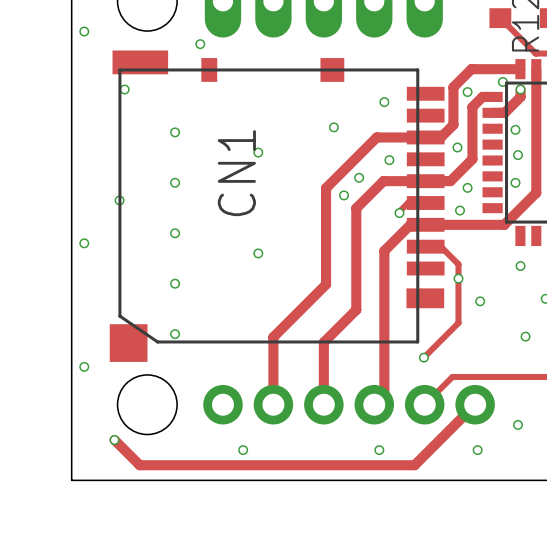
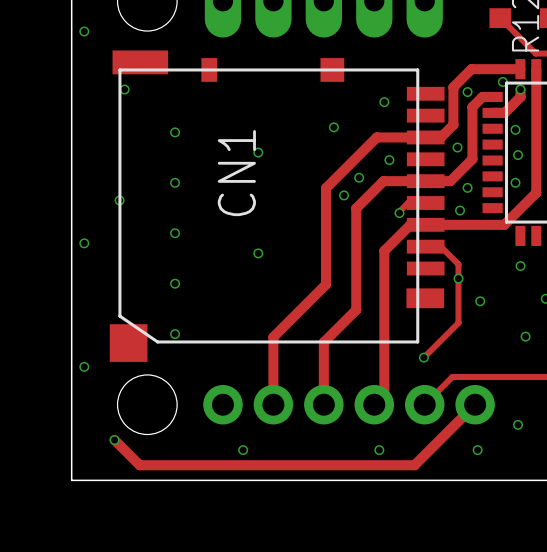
via: (200, 44) -> none

